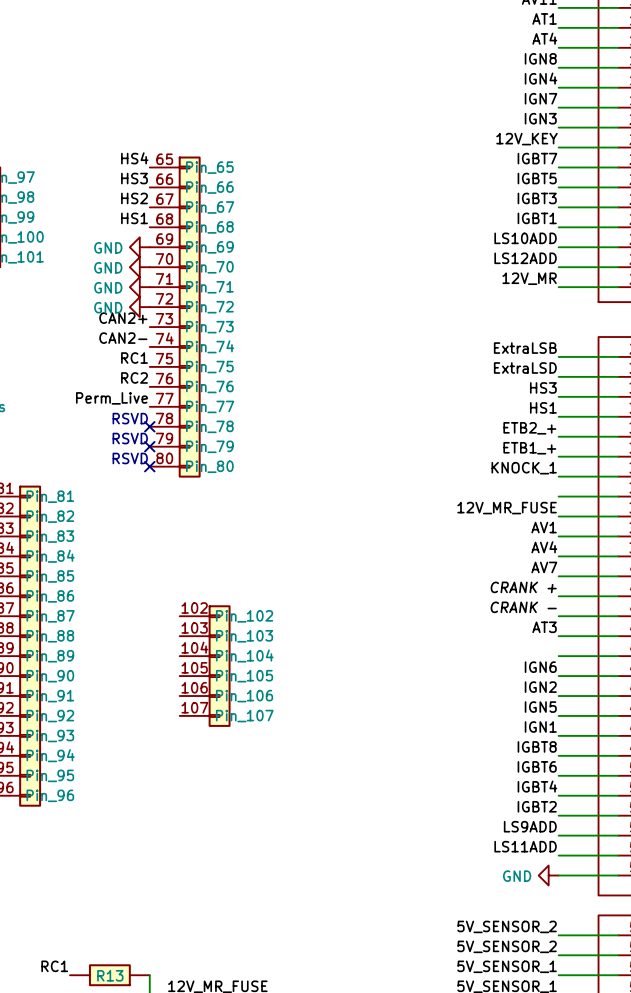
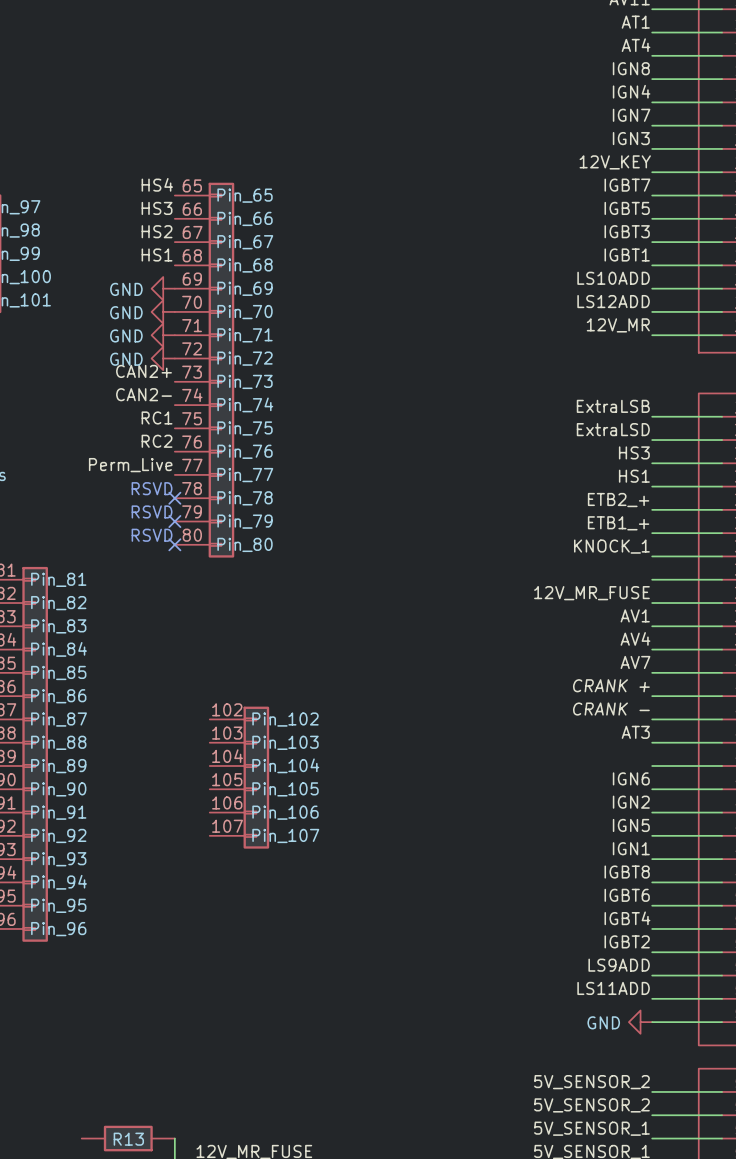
label: RC1 (54, 966) -> none

